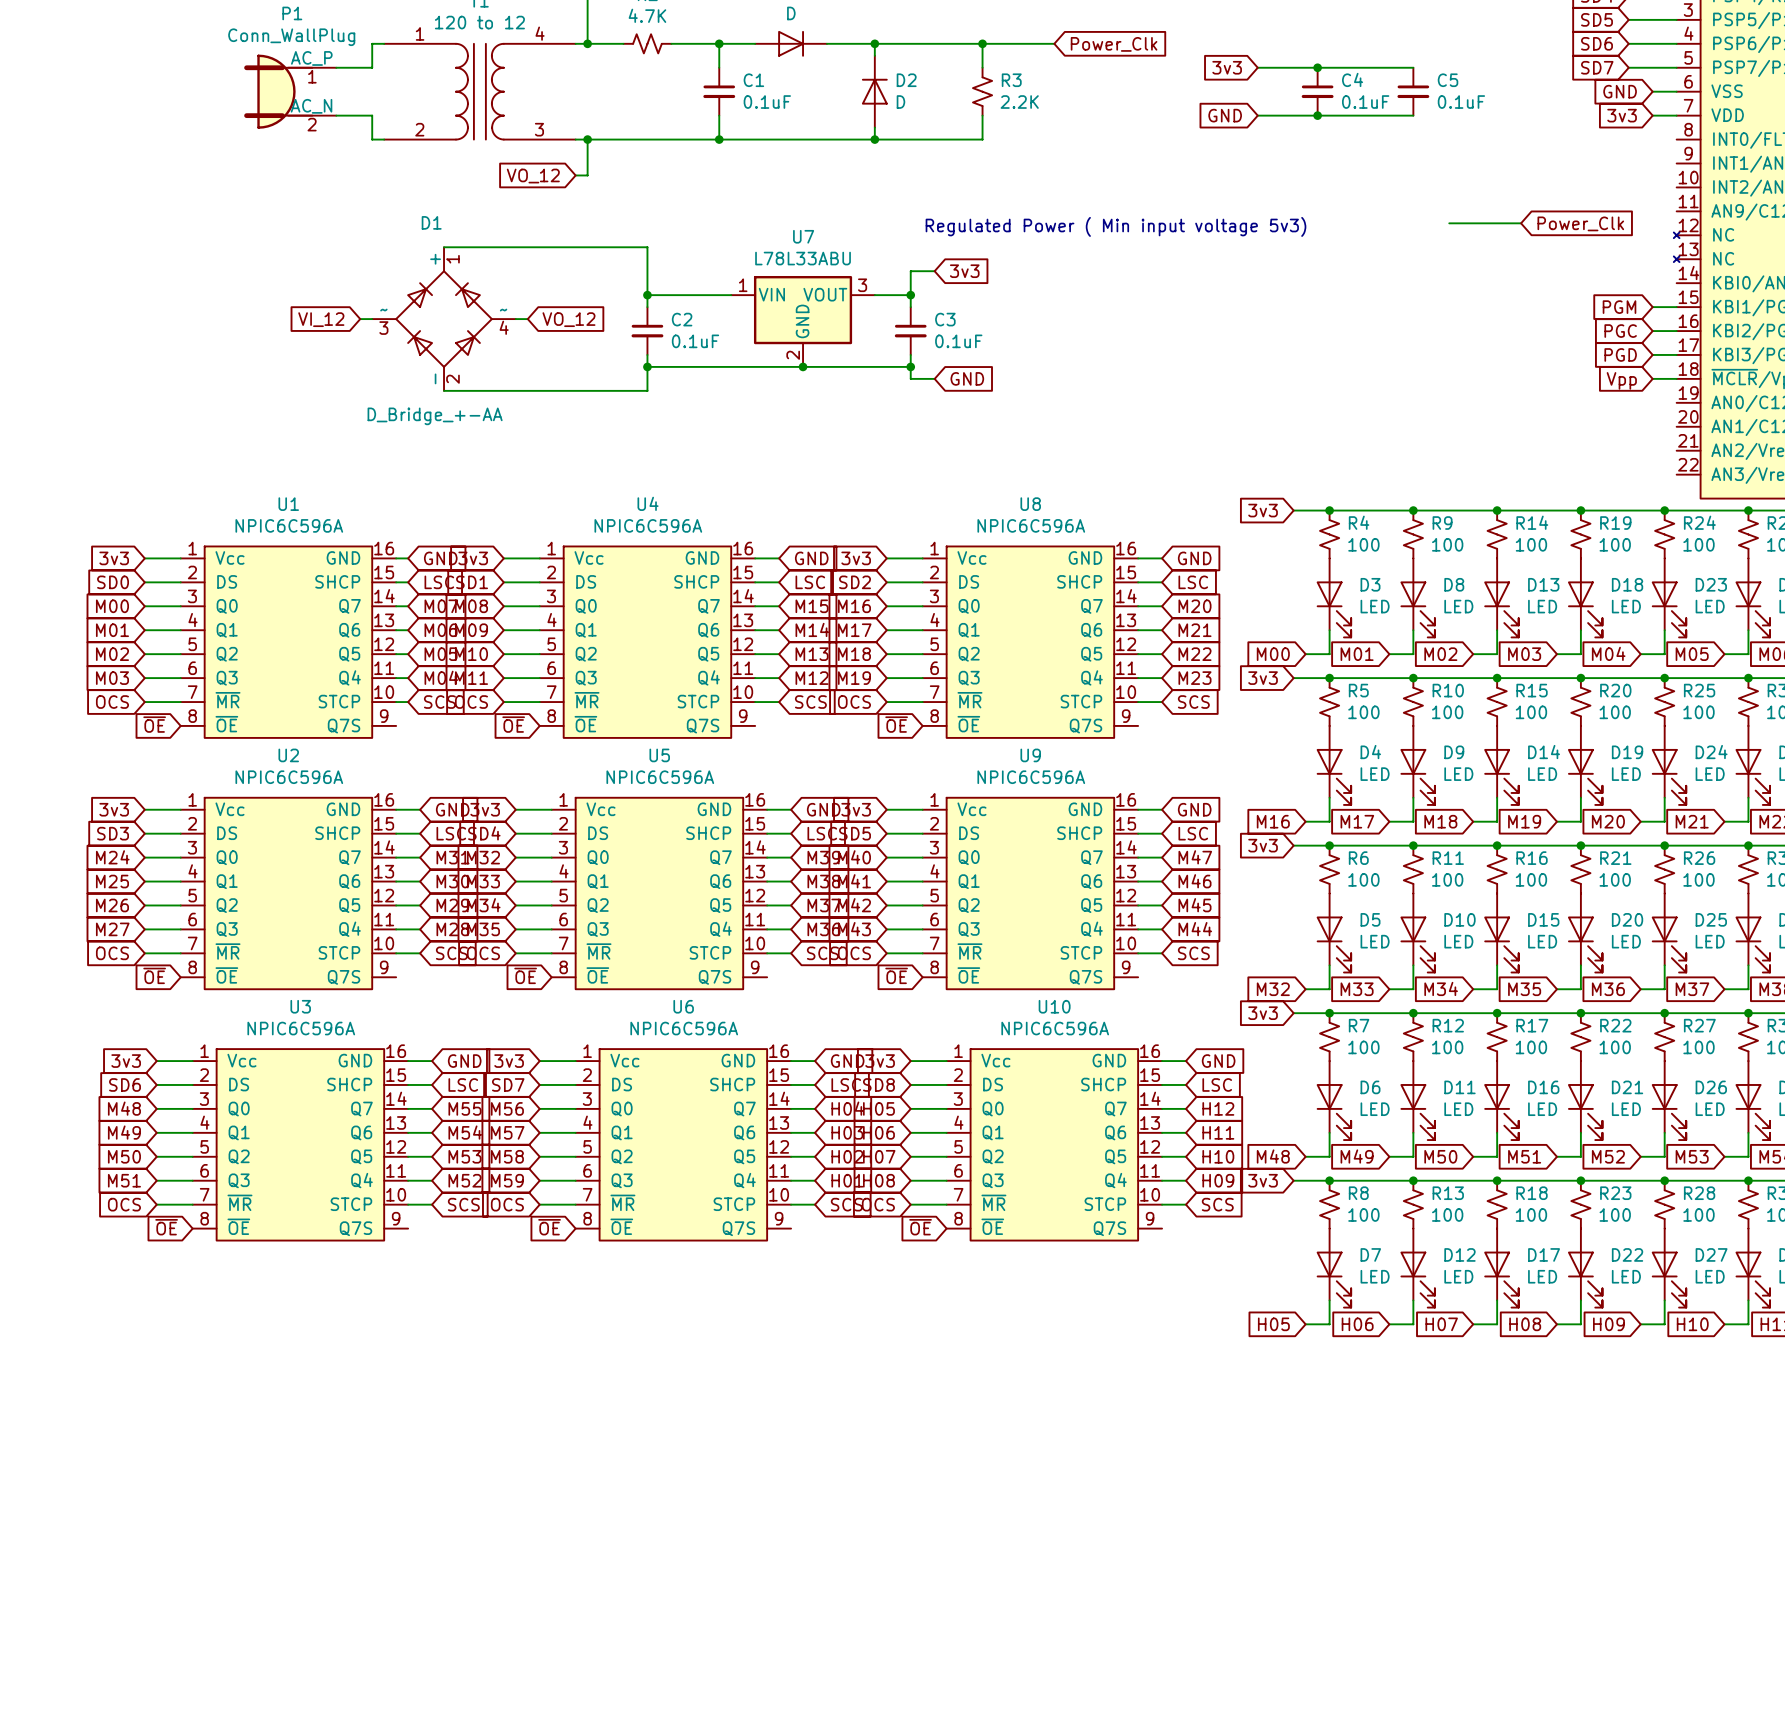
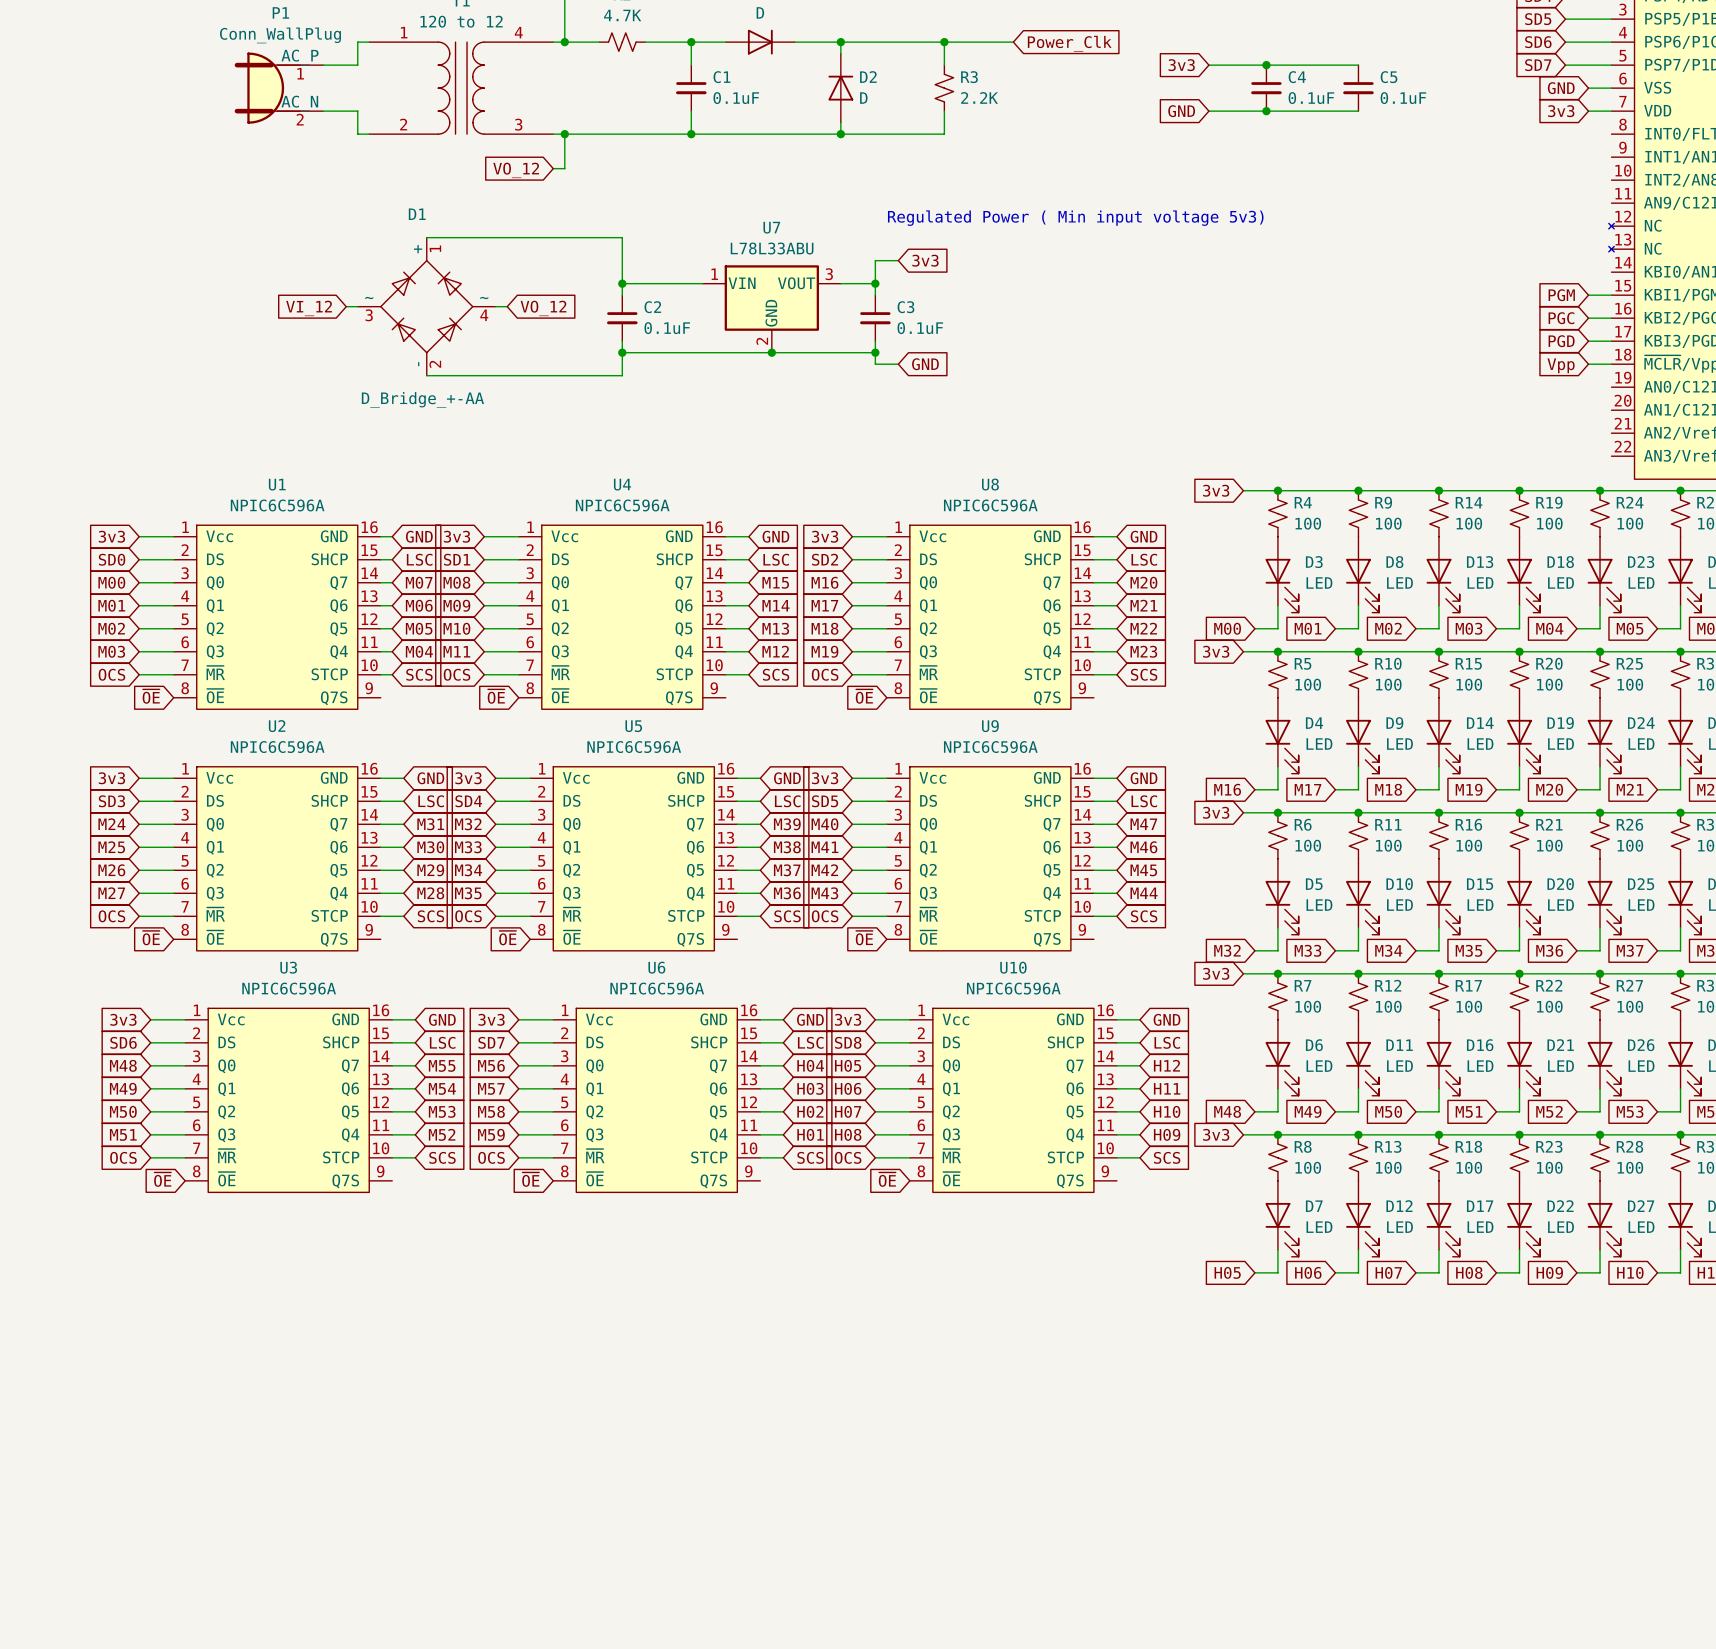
wire: (1449, 223) (1521, 223) -> none
global label: Power_Clk (1580, 223) -> none

